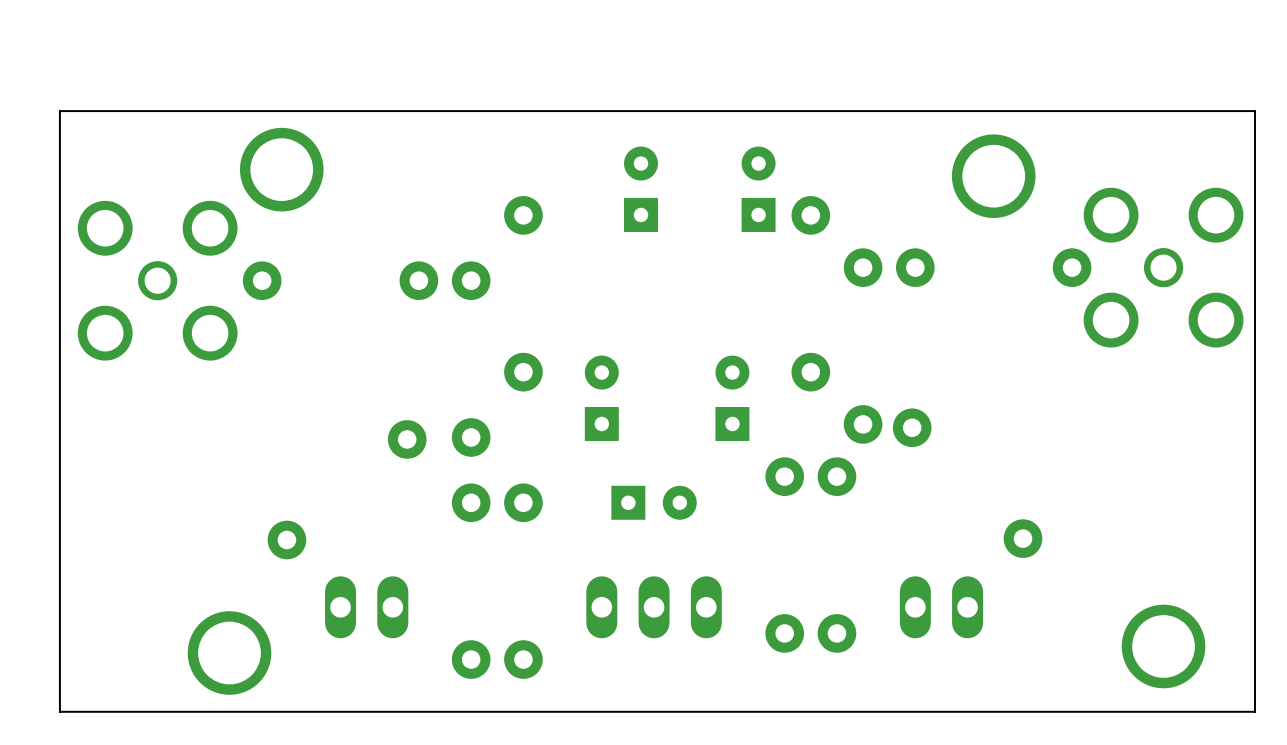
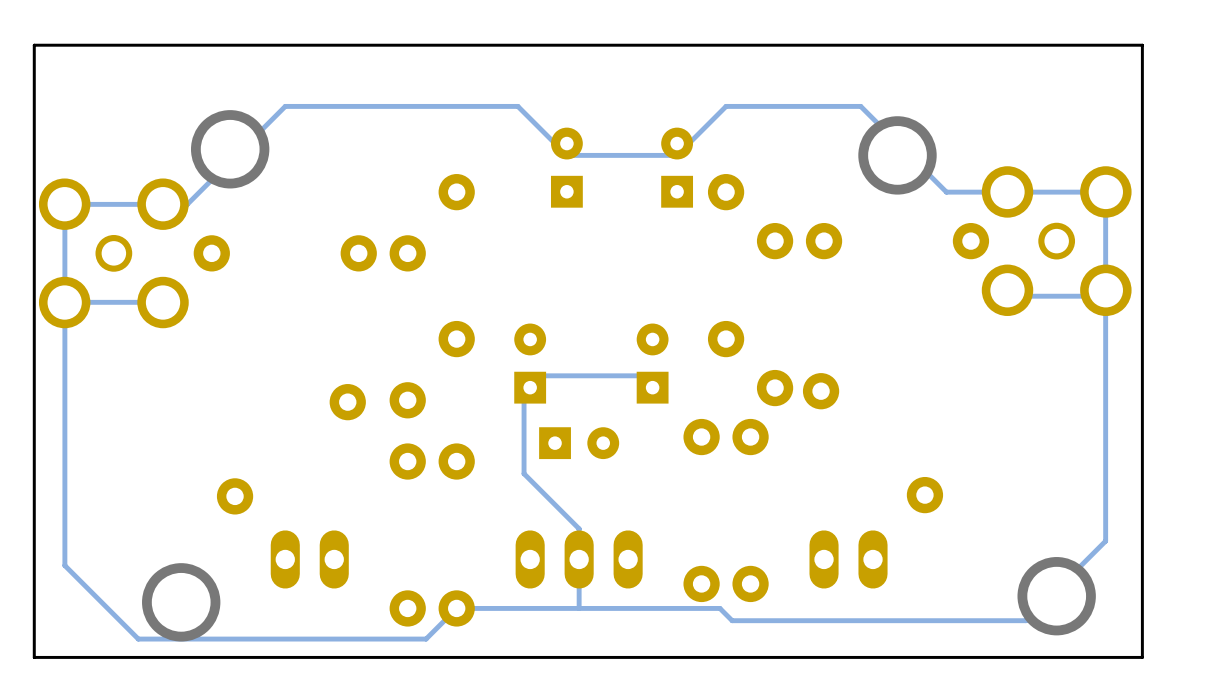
board edge: (1254, 111) (59, 111) (59, 711) (72, 711) -> (1142, 94) (1142, 45) (34, 45) (34, 657) (1142, 657) (1142, 45) (34, 45) (34, 657)
track: none -> (1105, 296) (1105, 541) (1026, 620) (732, 620) (719, 608) (456, 608) (426, 639) (138, 639) (64, 565) (64, 204) (187, 204) (285, 106) (517, 106) (566, 155) (677, 155) (726, 106) (860, 106) (946, 192) (1105, 192) (1105, 290) (1099, 296) (1007, 296)
track: none -> (162, 302) (64, 302)
track: none -> (652, 375) (530, 375) (524, 381) (524, 473) (579, 528) (579, 608)
part position: (654, 502) -> (579, 443)

